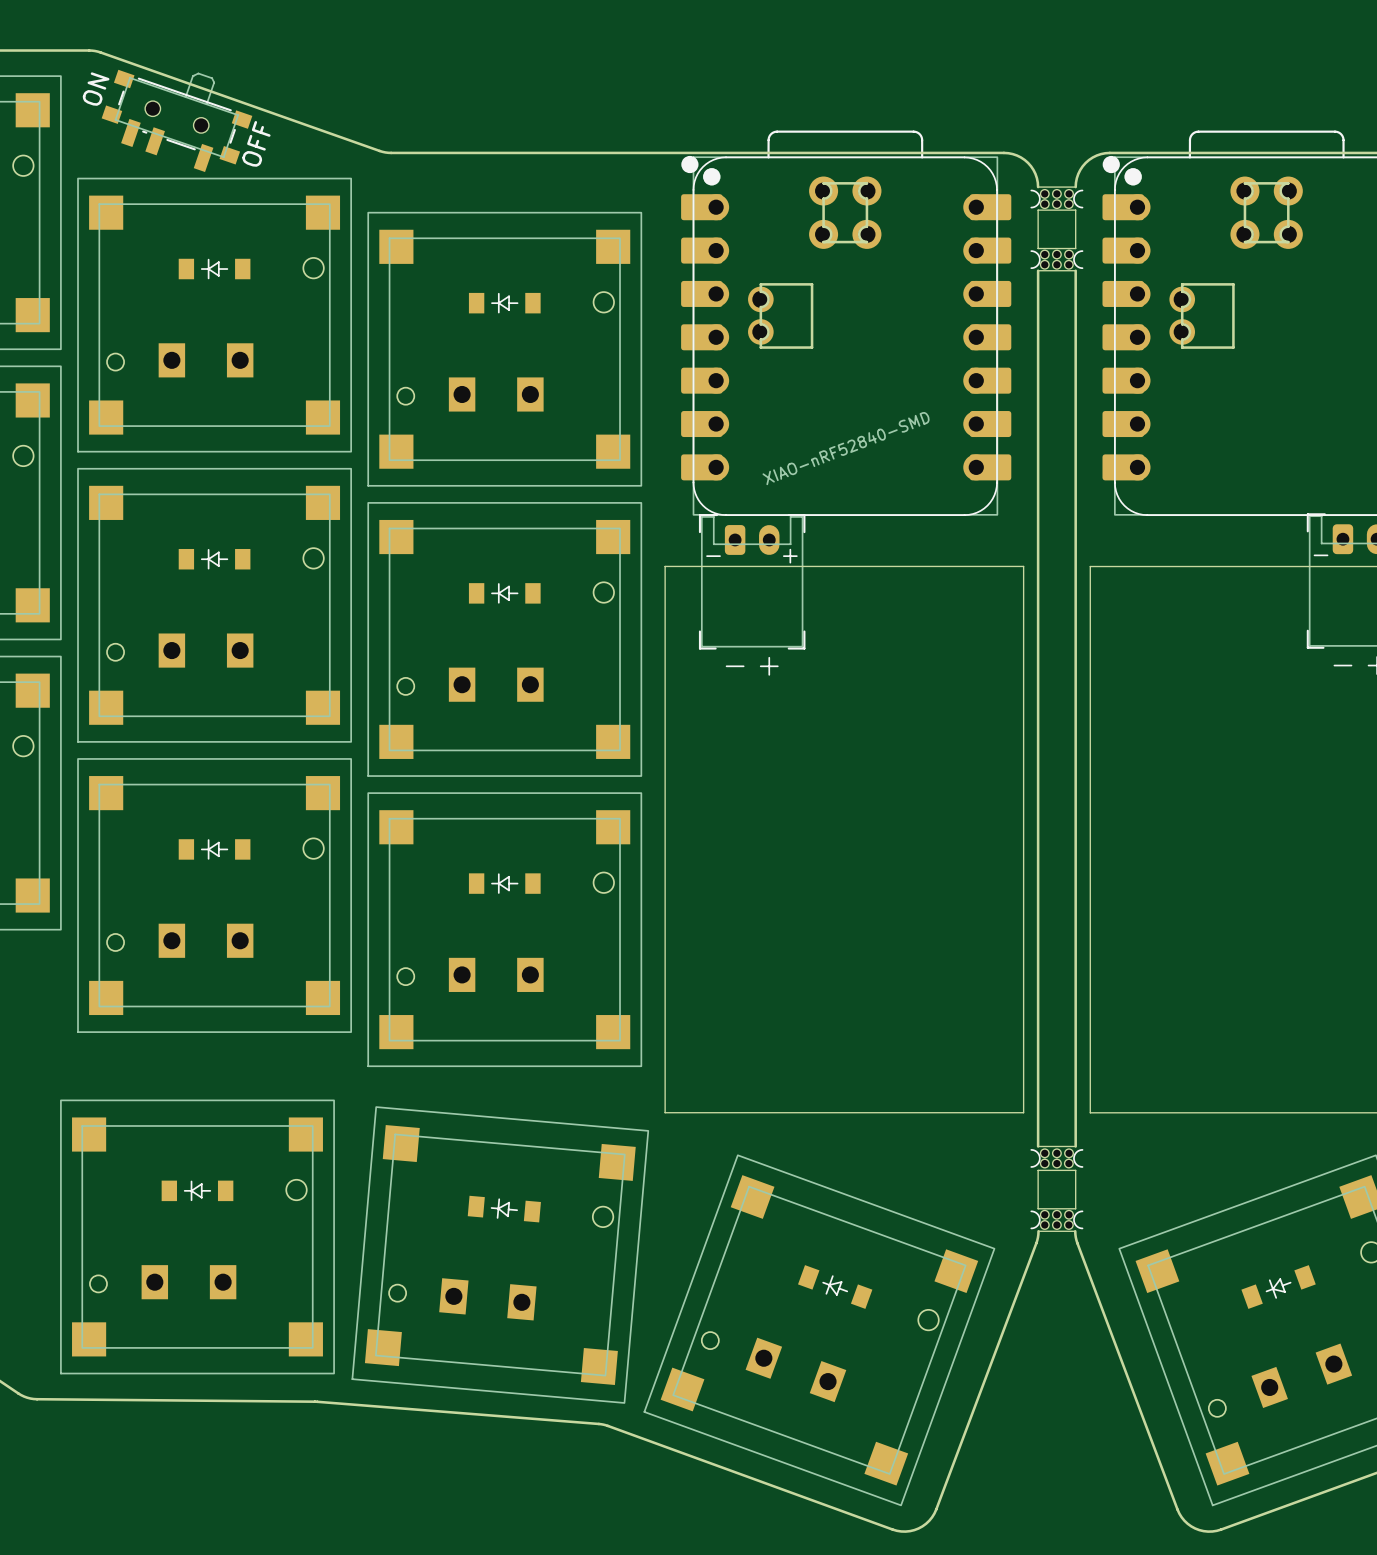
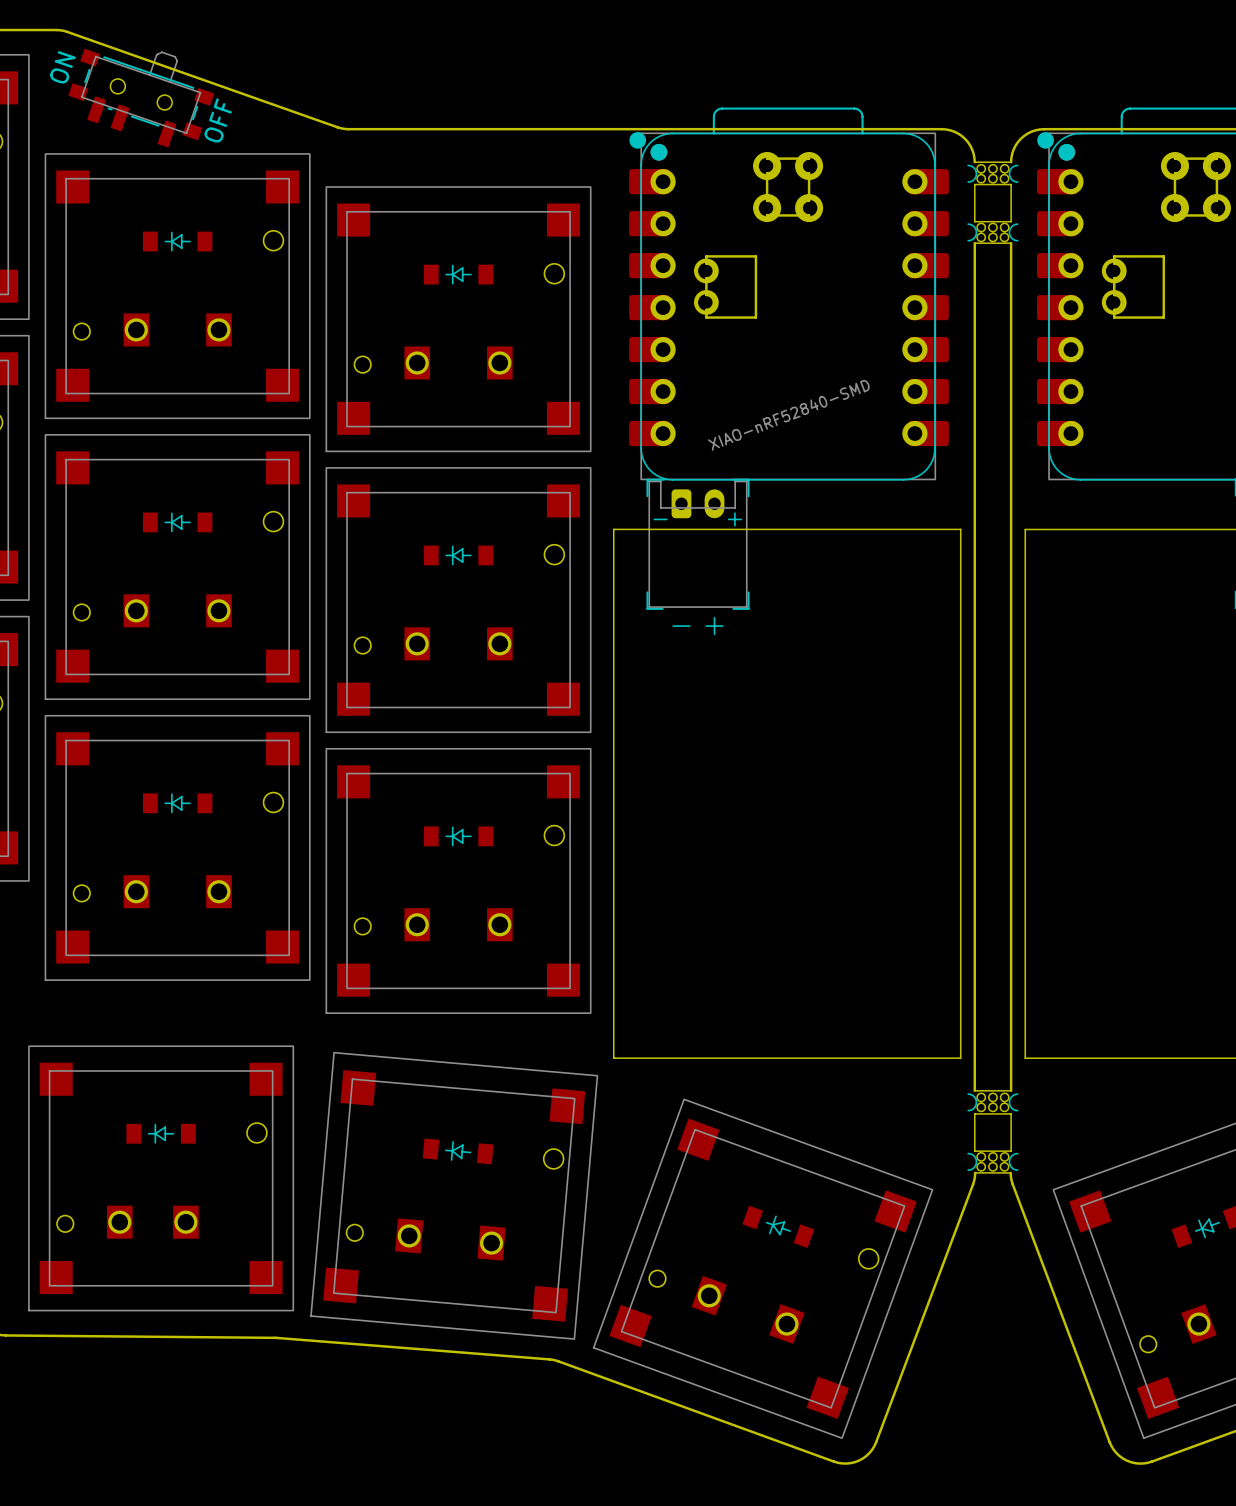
part footprint: [77, 177, 352, 453] -> [44, 153, 311, 420]
part footprint: [367, 211, 643, 487] -> [325, 186, 592, 453]
part footprint: [77, 467, 352, 743] -> [44, 434, 311, 701]
part footprint: [367, 502, 643, 777] -> [325, 467, 592, 734]
part footprint: [77, 758, 352, 1033] -> [44, 714, 311, 981]
part footprint: [367, 792, 643, 1068] -> [325, 747, 592, 1014]
part footprint: [351, 1106, 650, 1404] -> [310, 1051, 599, 1340]
part footprint: [643, 1154, 996, 1507] -> [592, 1098, 934, 1440]

